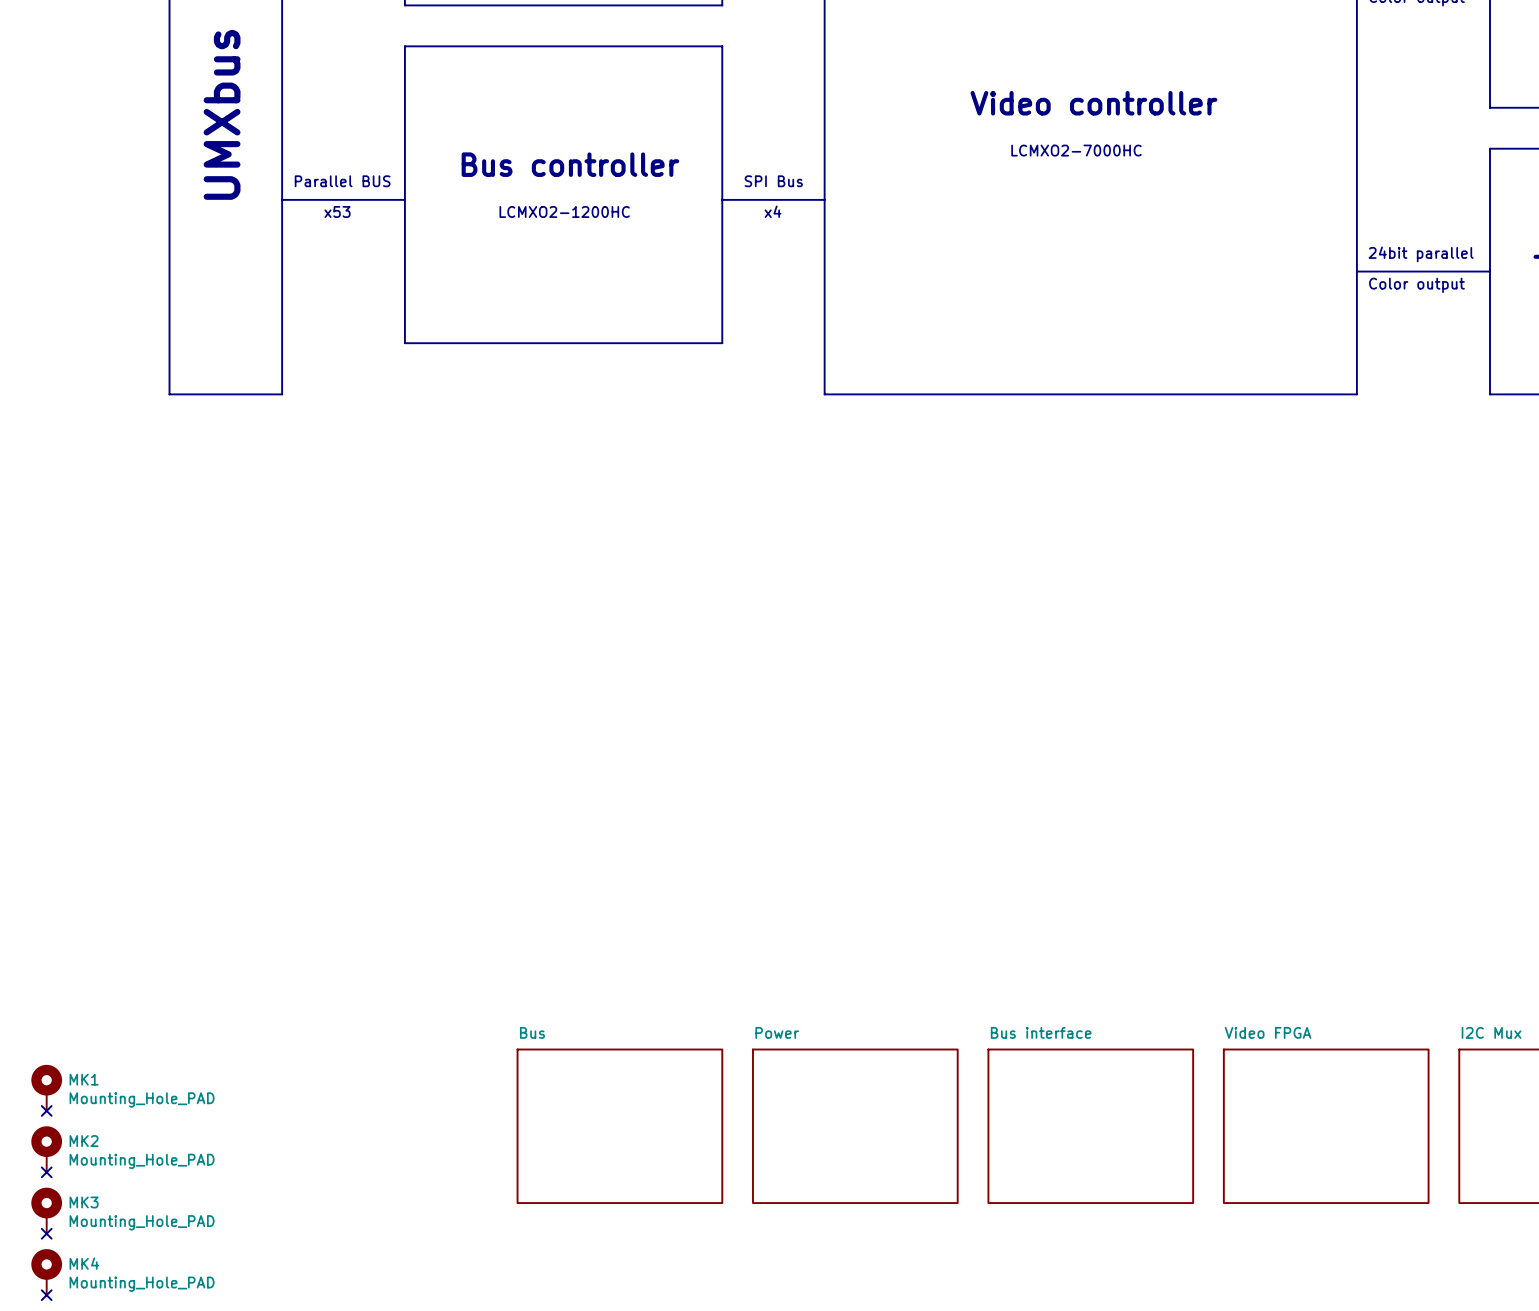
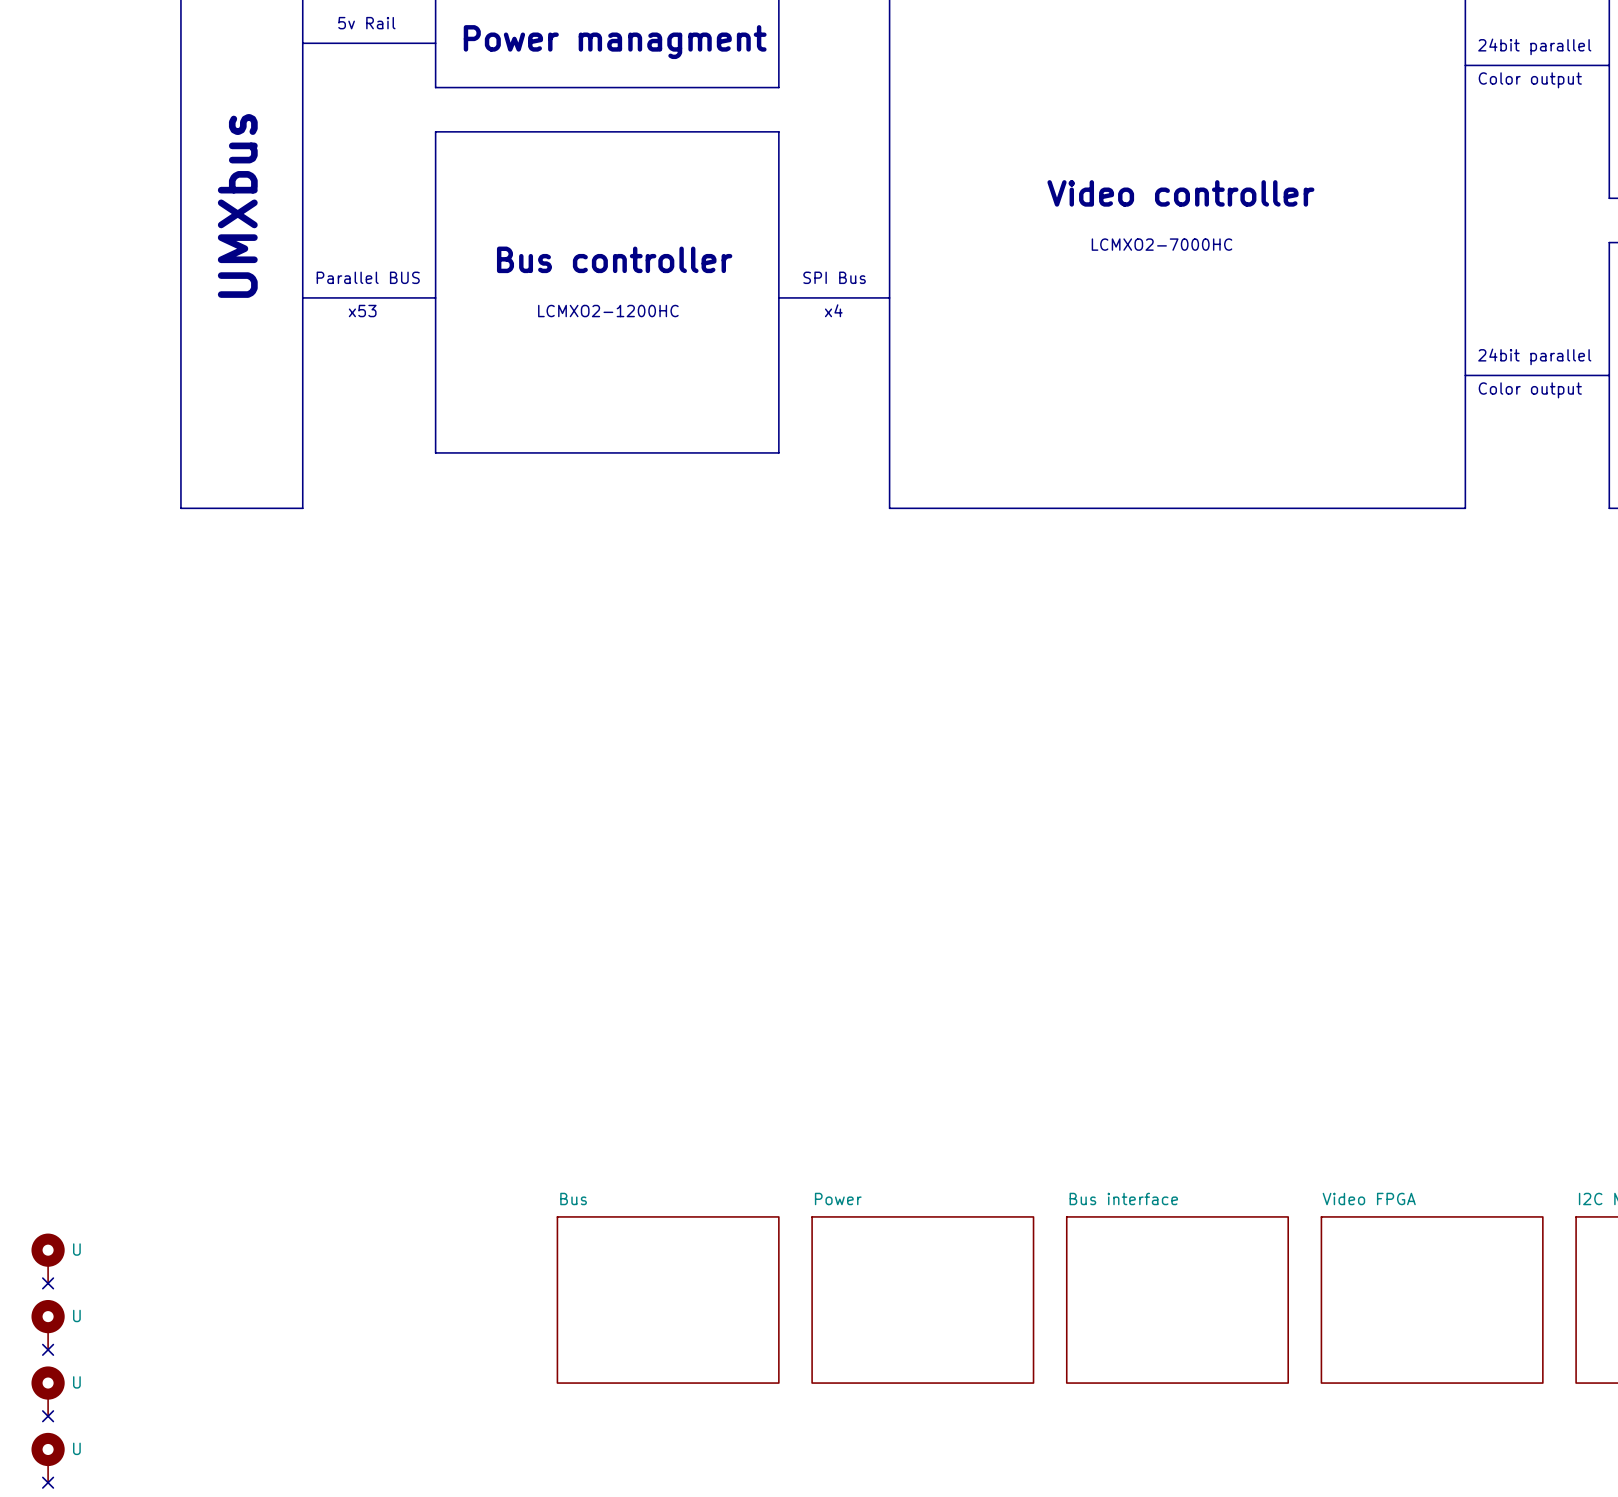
MK1 name: MK1 (84, 1079) -> U (76, 1249)
MK1 value: Mounting_Hole_PAD (142, 1099) -> none
MK2 name: MK2 (84, 1141) -> U (76, 1315)
MK2 value: Mounting_Hole_PAD (142, 1161) -> none
MK3 name: MK3 (84, 1202) -> U (76, 1382)
MK3 value: Mounting_Hole_PAD (142, 1222) -> none
MK4 name: MK4 (84, 1263) -> U (76, 1448)
MK4 value: Mounting_Hole_PAD (142, 1284) -> none

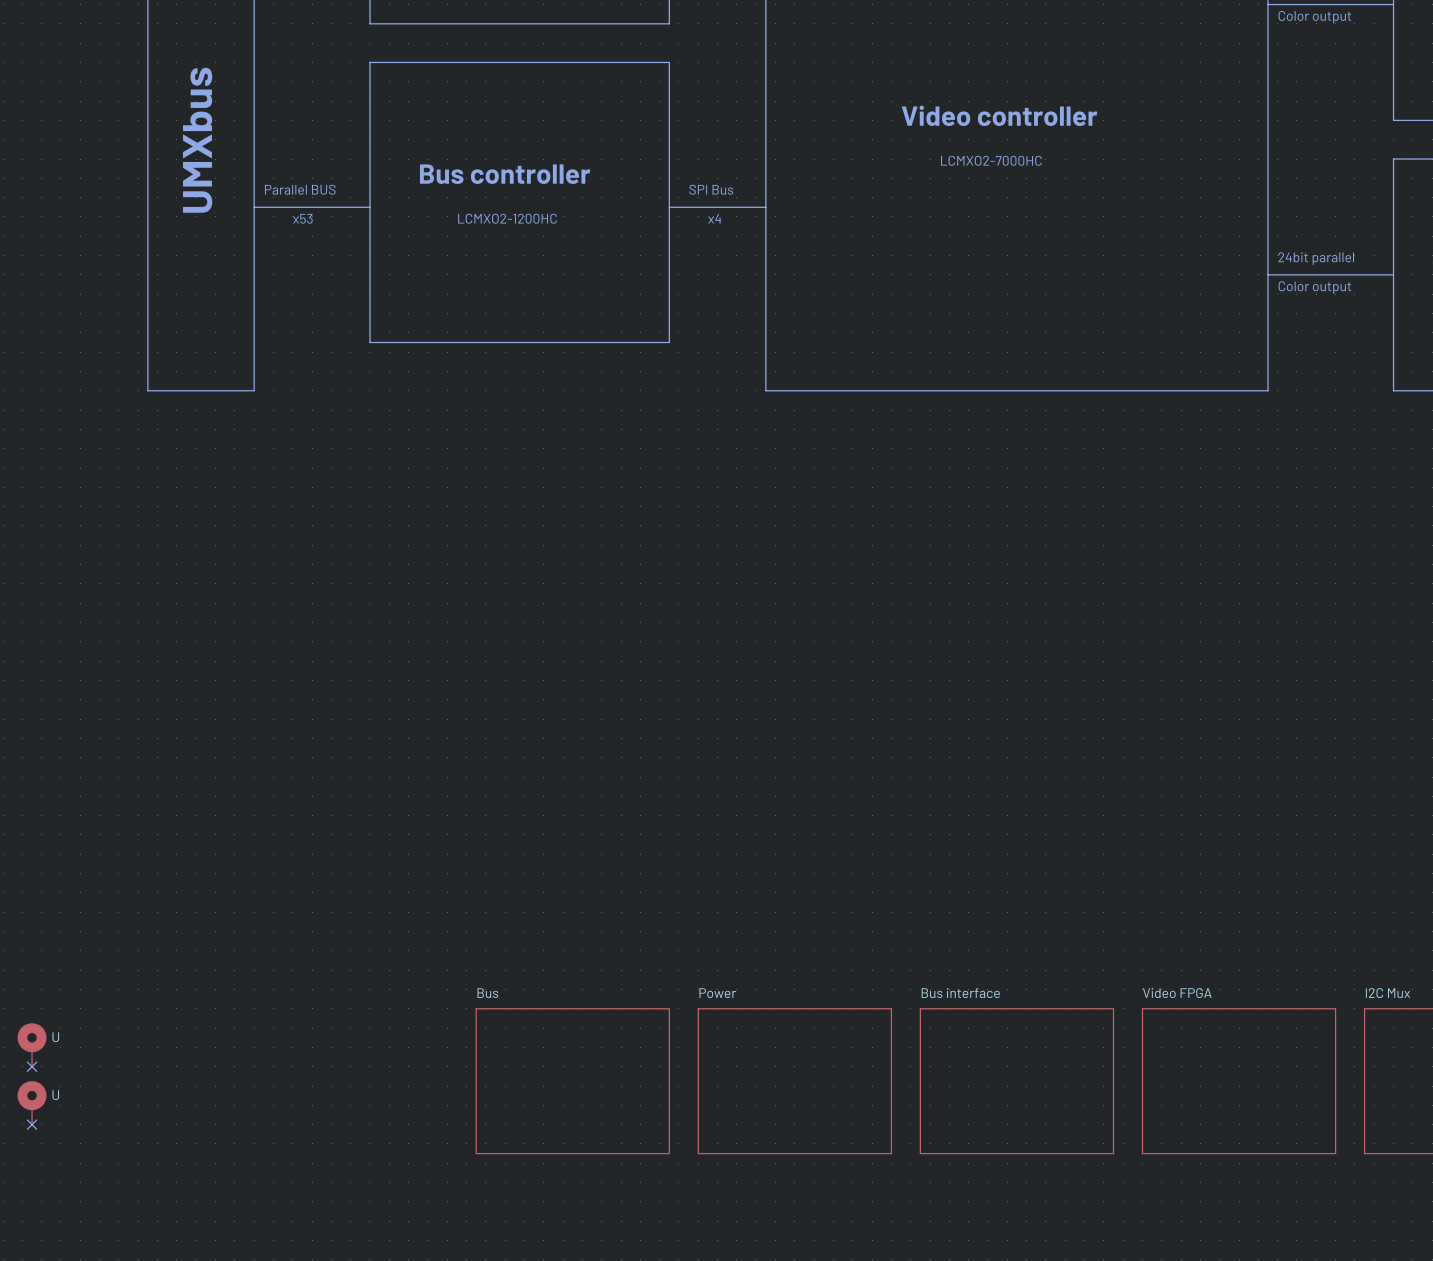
U: (48, 1391) -> none
no-connect mark: (48, 1416) -> none
U: (48, 1457) -> none
no-connect mark: (48, 1482) -> none

